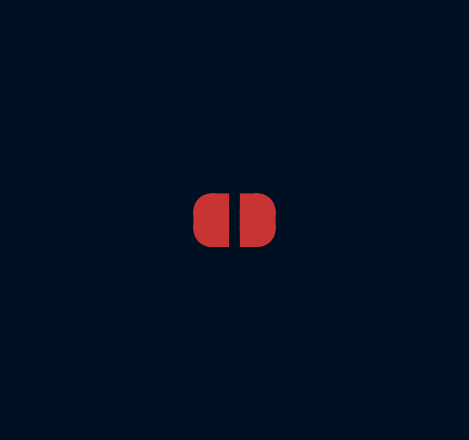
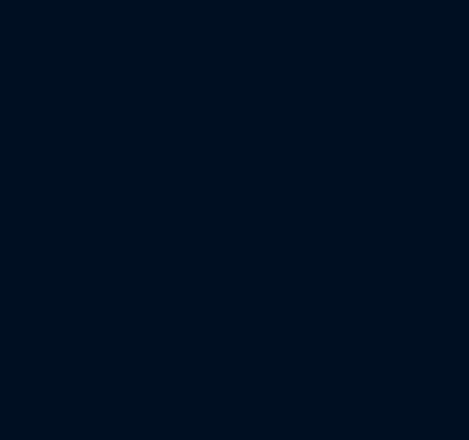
part: (234, 220) -> none

